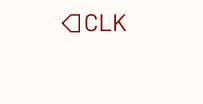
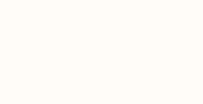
hierarchical label: CLK (105, 22) -> none

